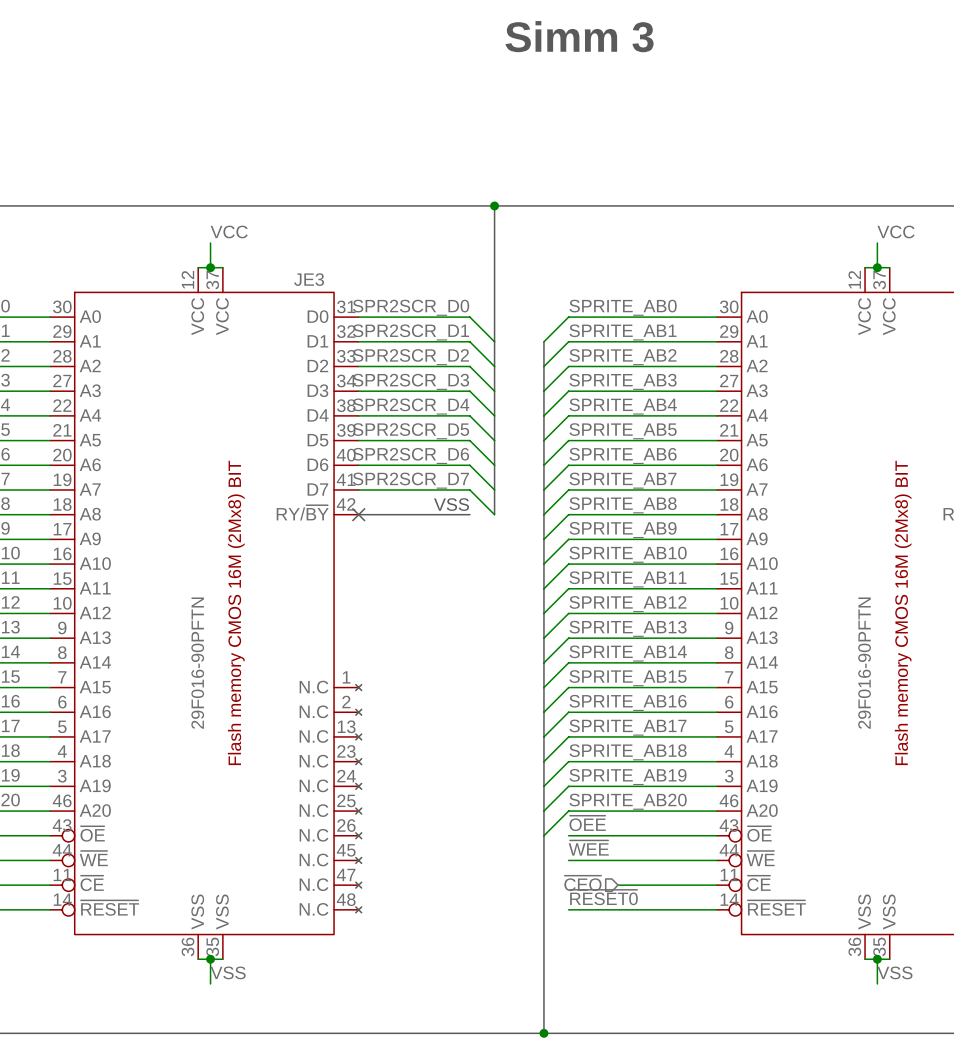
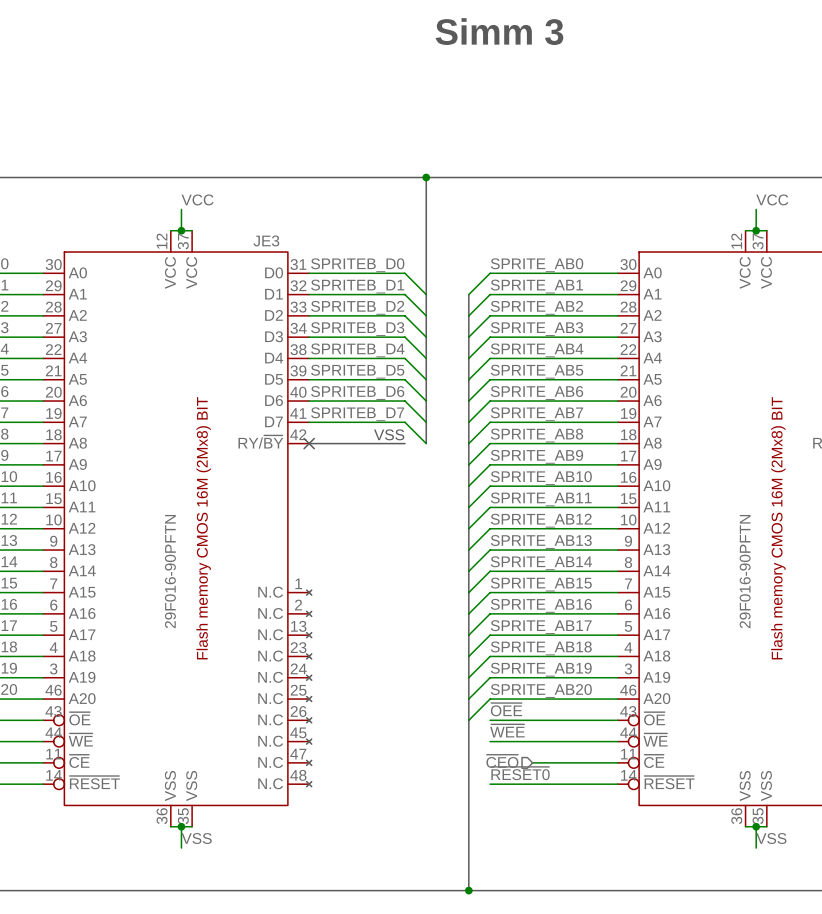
label: SPR2SCR_D0 (411, 307) -> SPRITEB_D0 (357, 265)
label: SPR2SCR_D1 (410, 332) -> SPRITEB_D1 (357, 286)
label: SPR2SCR_D2 (410, 357) -> SPRITEB_D2 (357, 307)
label: SPR2SCR_D3 (411, 381) -> SPRITEB_D3 (357, 329)
label: SPR2SCR_D4 (411, 406) -> SPRITEB_D4 (357, 350)
label: SPR2SCR_D5 (411, 431) -> SPRITEB_D5 (357, 371)
label: SPR2SCR_D6 (411, 455) -> SPRITEB_D6 (357, 392)
label: SPR2SCR_D7 (410, 480) -> SPRITEB_D7 (357, 414)

